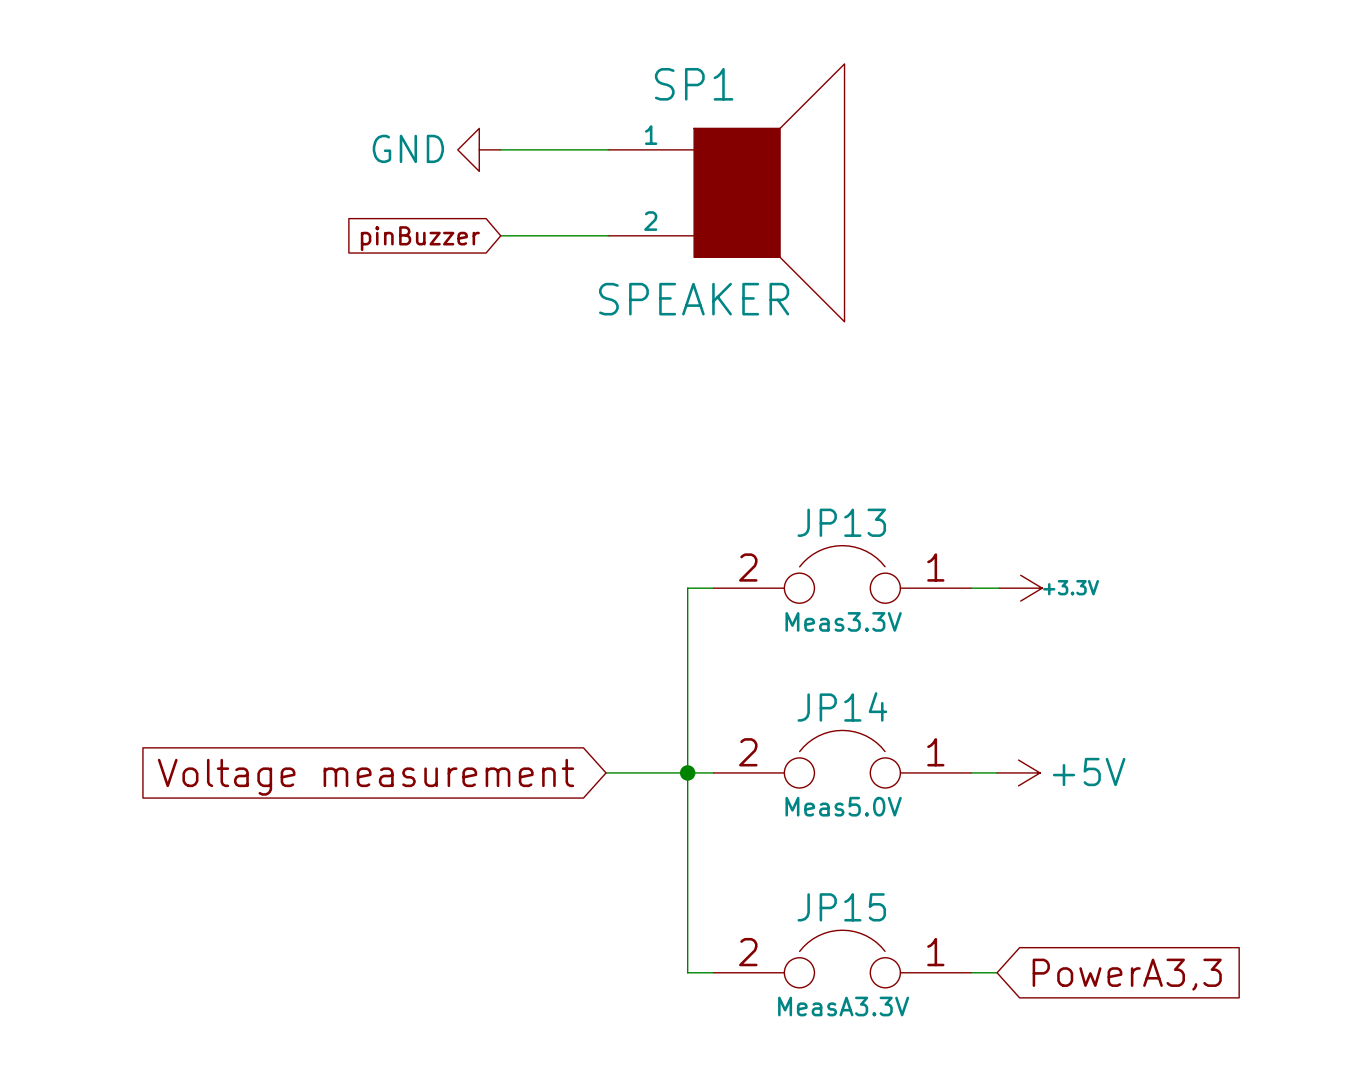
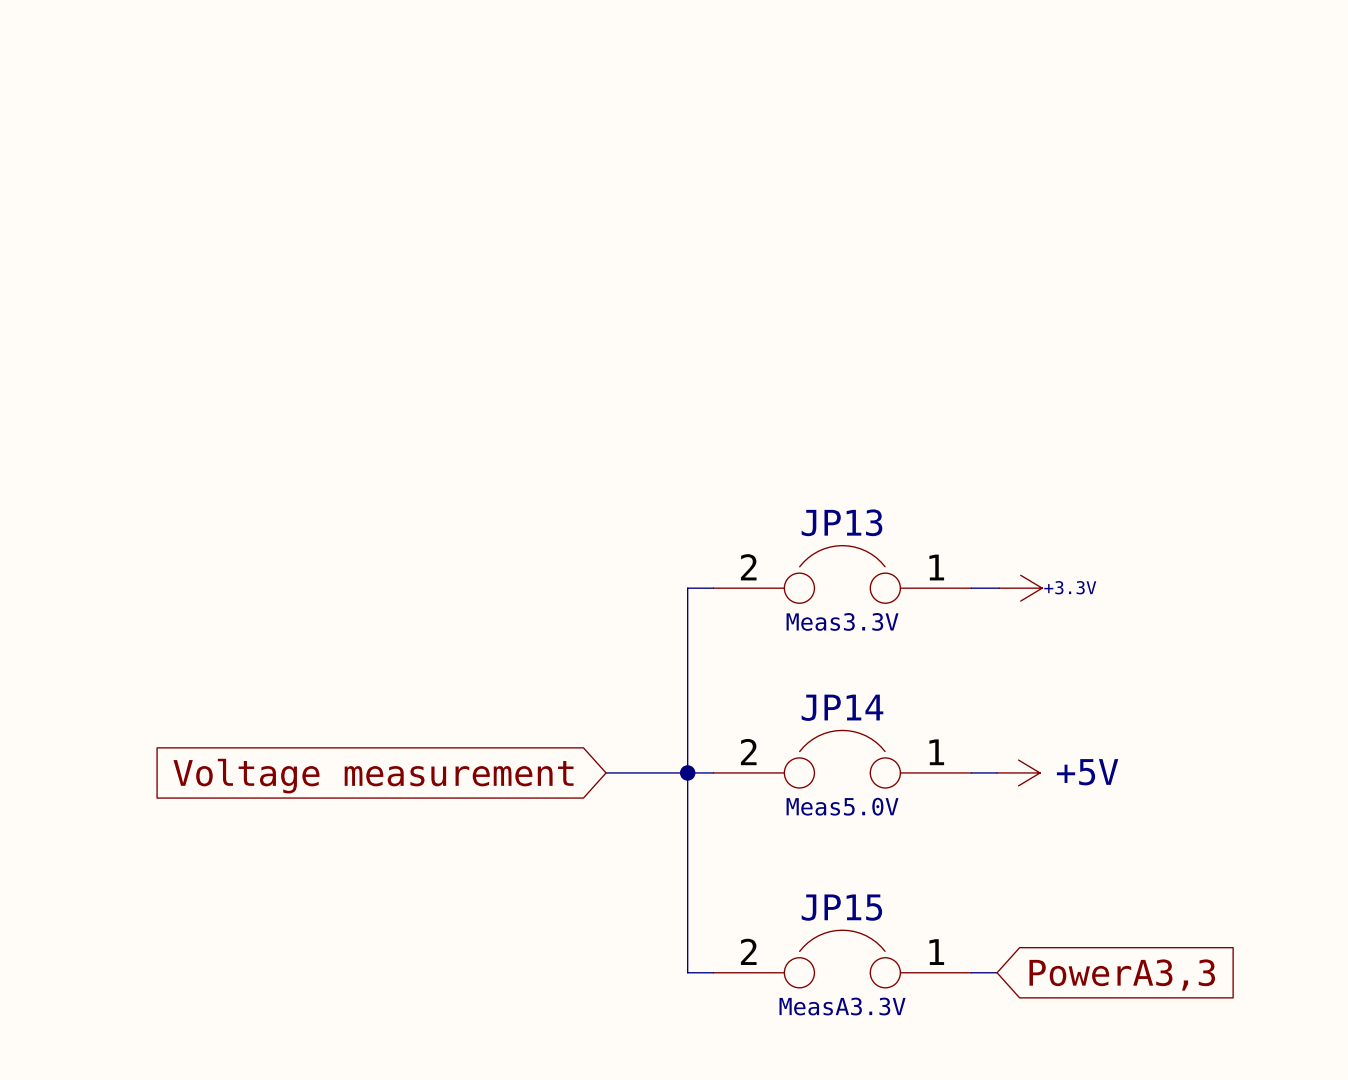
power symbol: GND (479, 149) -> none
wire: (500, 149) (608, 149) -> none
SP1: SPEAKER (726, 192) -> none
wire: (500, 235) (608, 235) -> none
global label: pinBuzzer (420, 238) -> none

